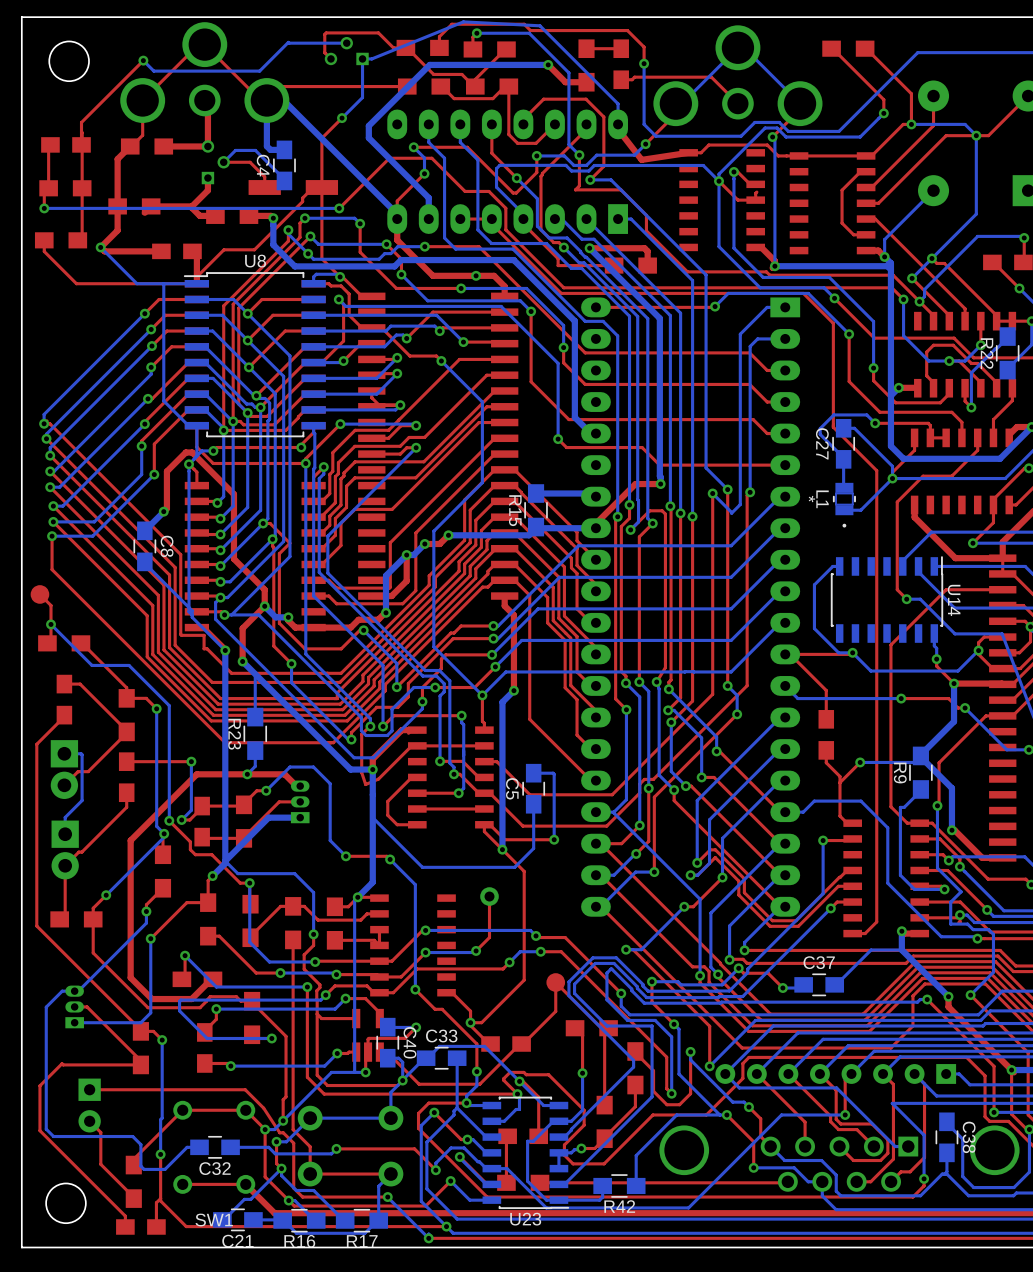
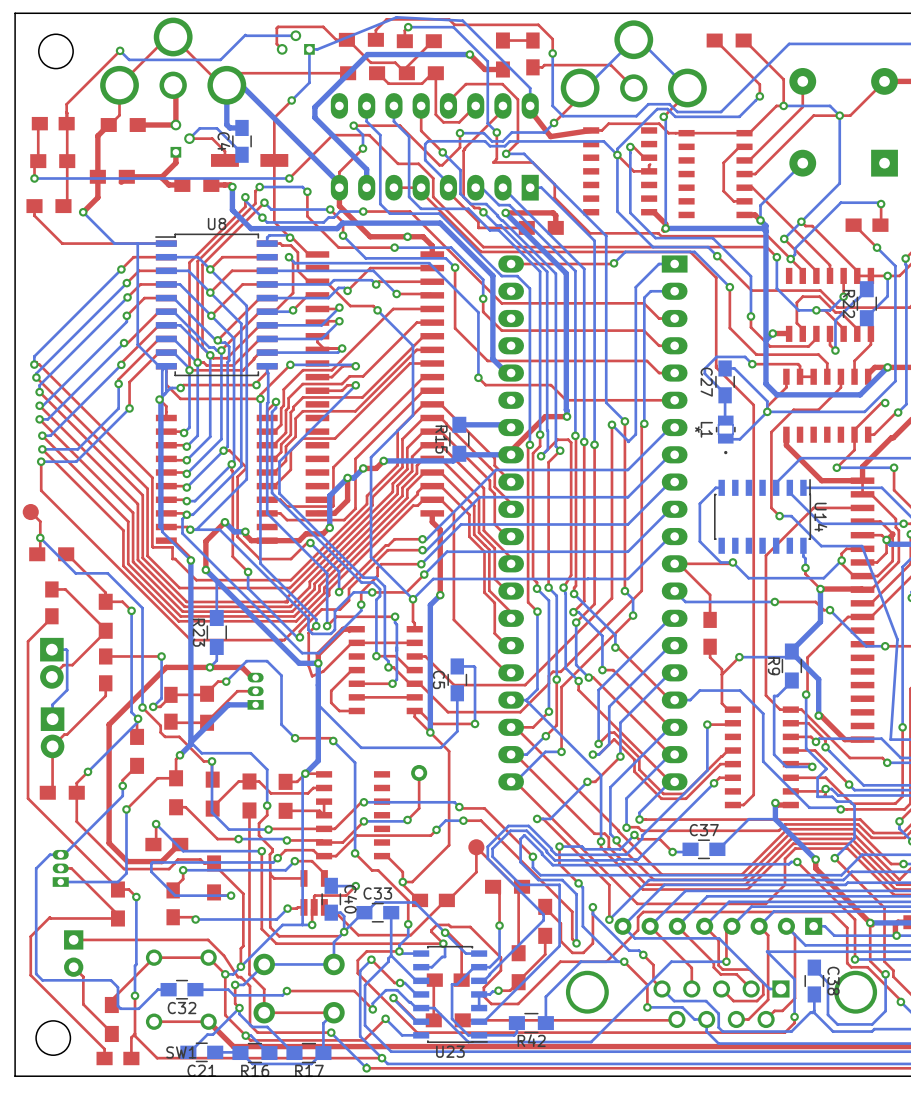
top track: (321, 187) (313, 187) (302, 198) (302, 201) (254, 249) (223, 249) (196, 276) (196, 283) (196, 255) (192, 251) -> none
top track: (100, 247) (104, 251) (161, 251) -> none
part: (176, 251) -> none
top track: (163, 511) (166, 508) (166, 471) (185, 452) (192, 452) (233, 494) (233, 558) (264, 589) (264, 606) -> none
bottom track: (163, 511) (144, 530) -> none
via: (163, 511) -> none
C8: (144, 546) -> none
bottom track: (144, 561) (192, 610) -> (166, 366) (162, 370) (162, 526)

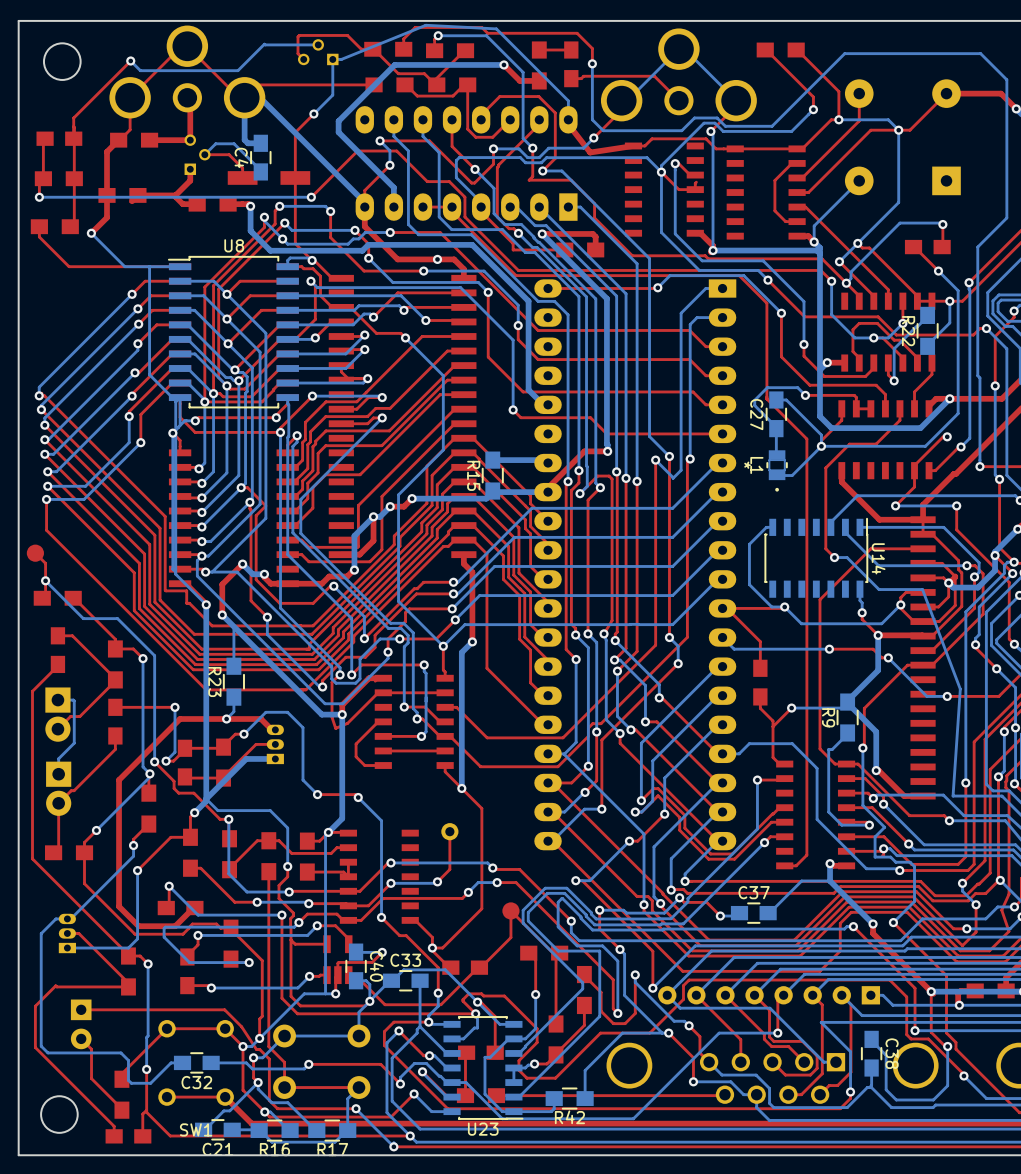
bottom track: (457, 666) (475, 667) (475, 723) -> none
C5: (457, 679) -> none
bottom track: (318, 685) (318, 704) (361, 747) (440, 747) (457, 731) (457, 693) -> none
top track: (414, 710) (419, 710) (432, 723) (475, 723) -> none
via: (475, 723) -> none

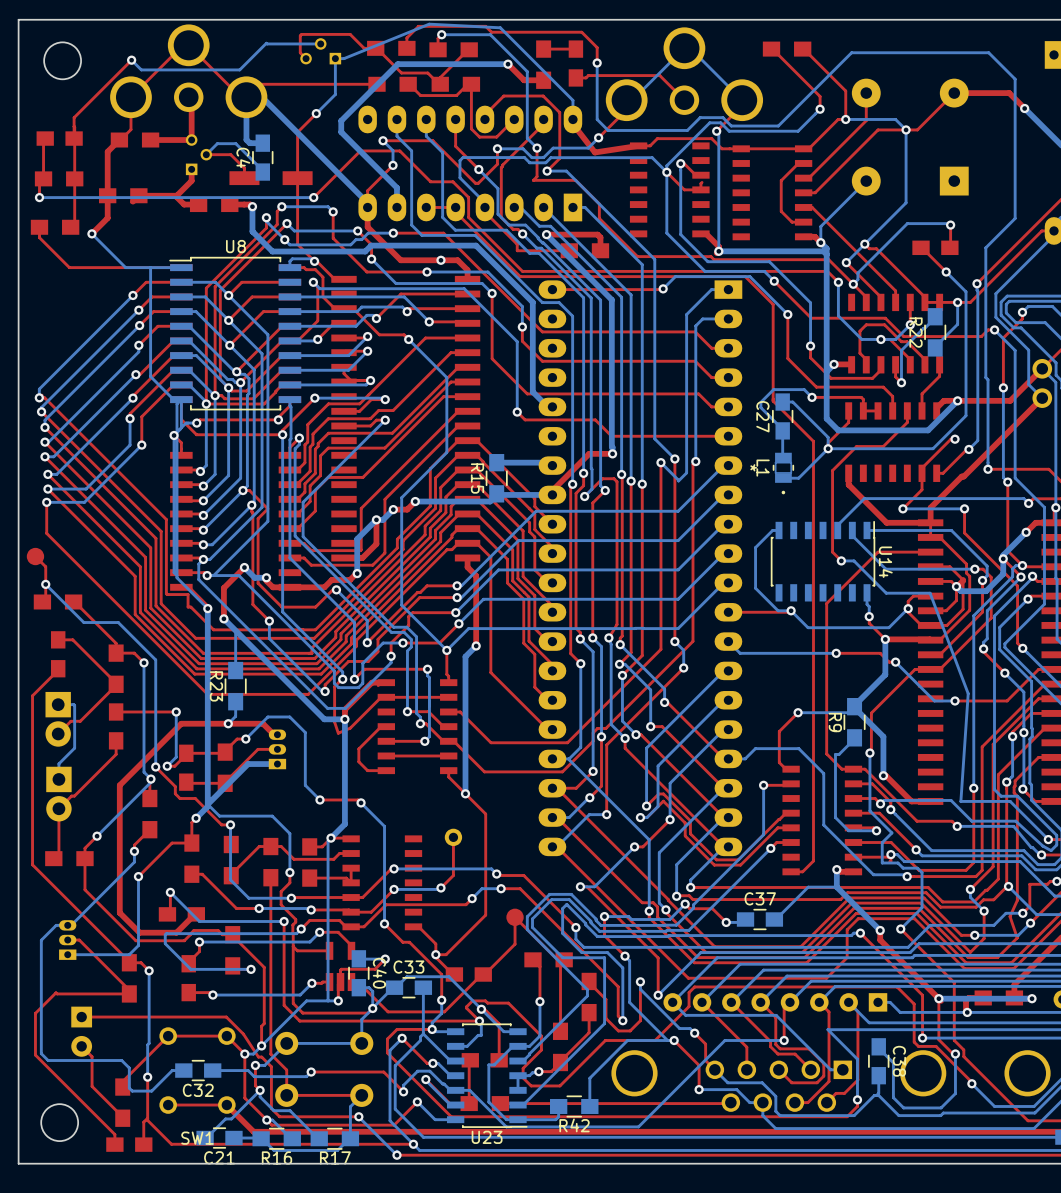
top track: (727, 608) (760, 641) (760, 668) -> none
part: (760, 682) -> none
top track: (760, 696) (760, 708) (773, 721) (773, 726) -> none

